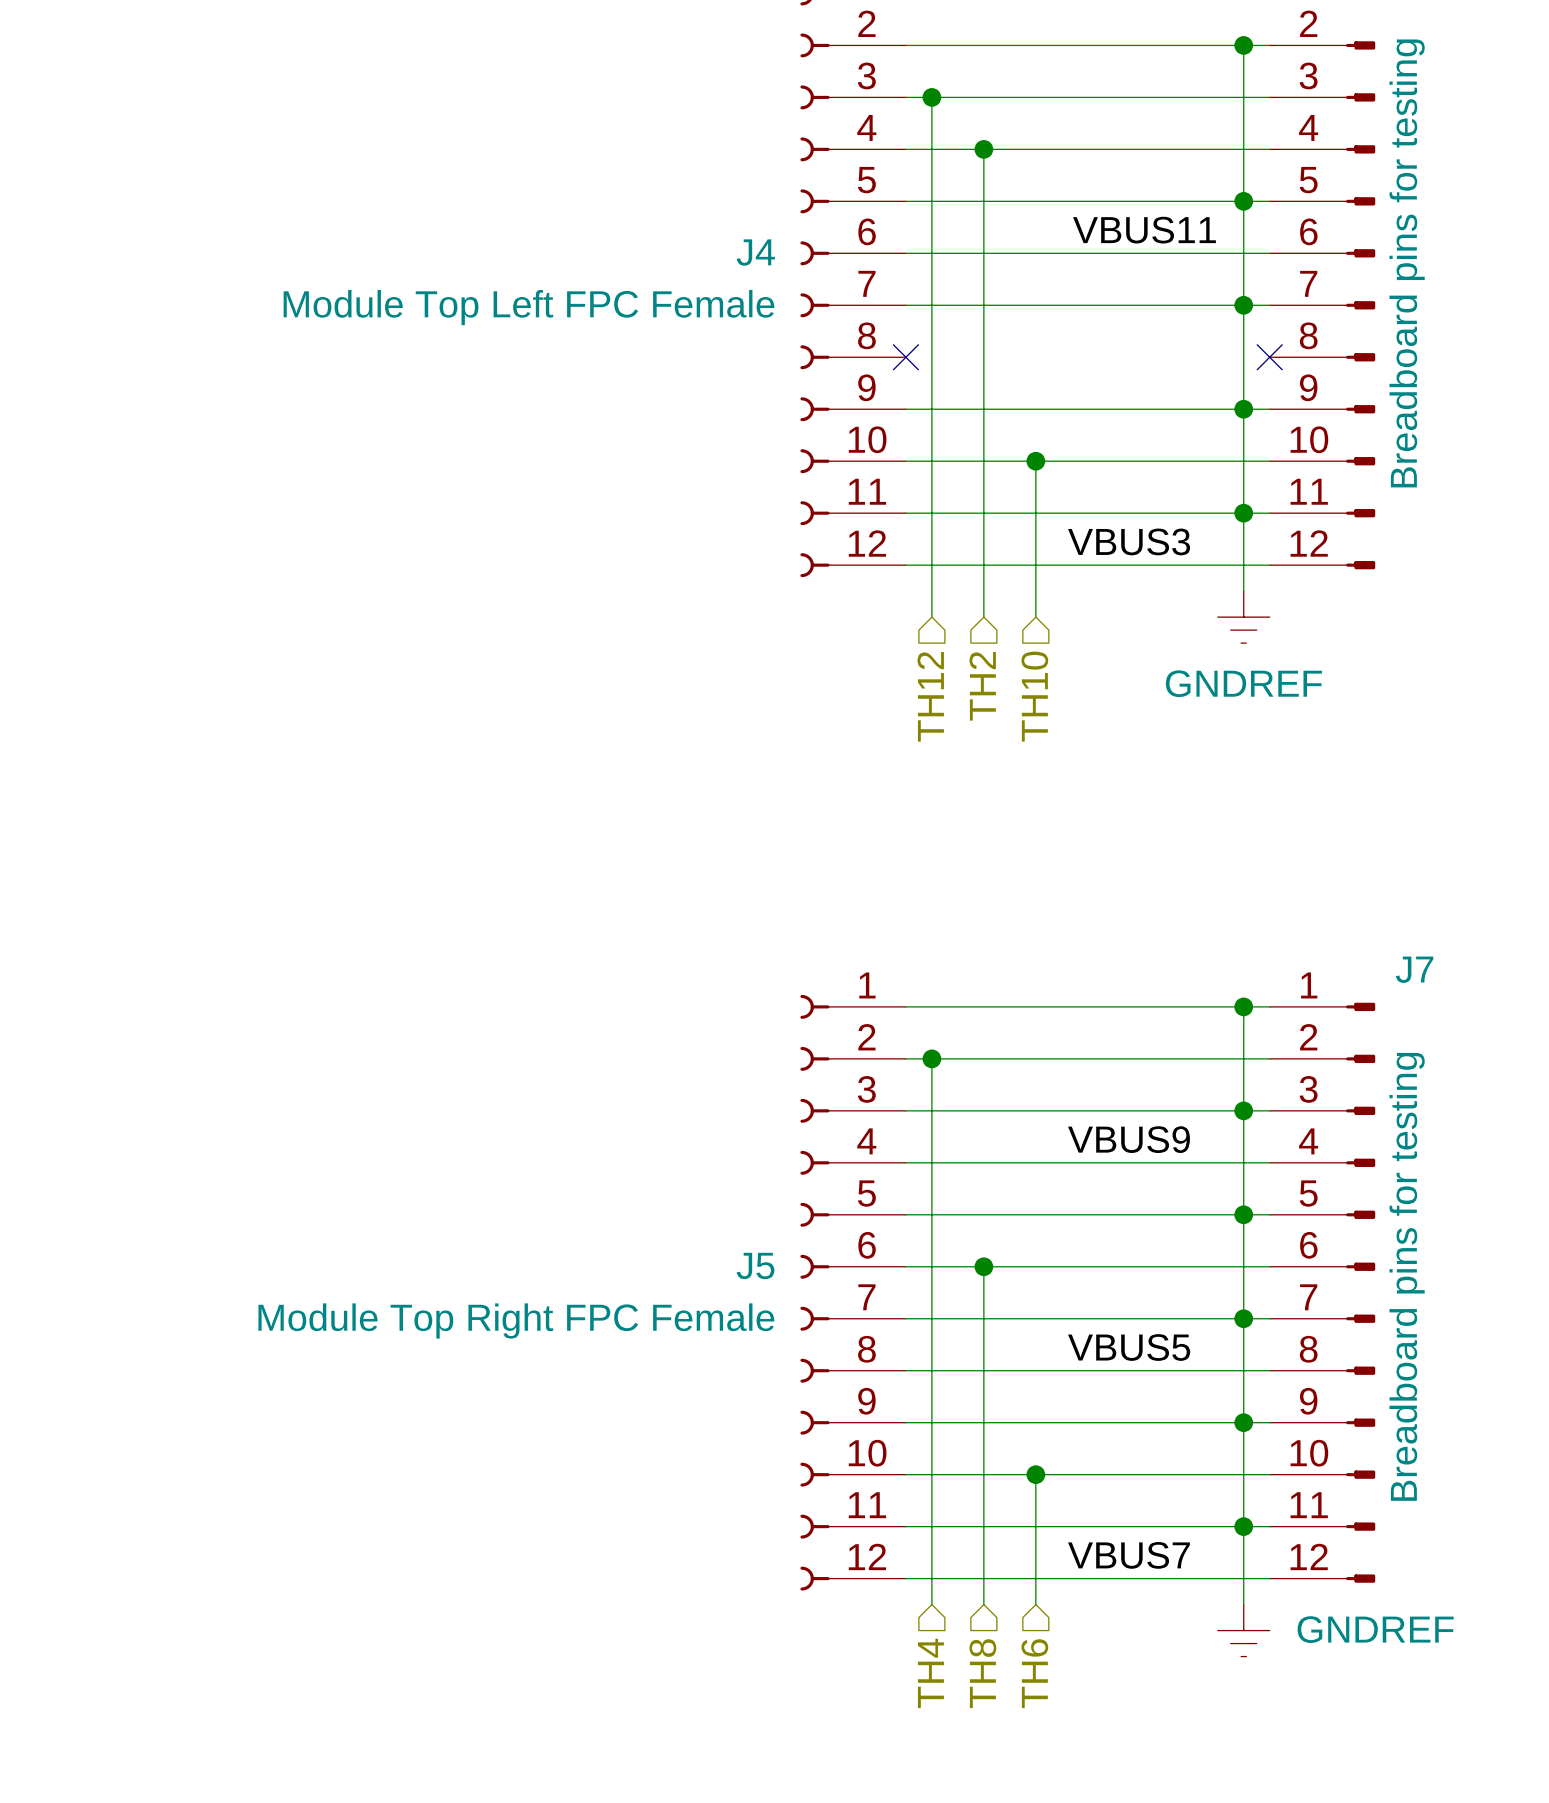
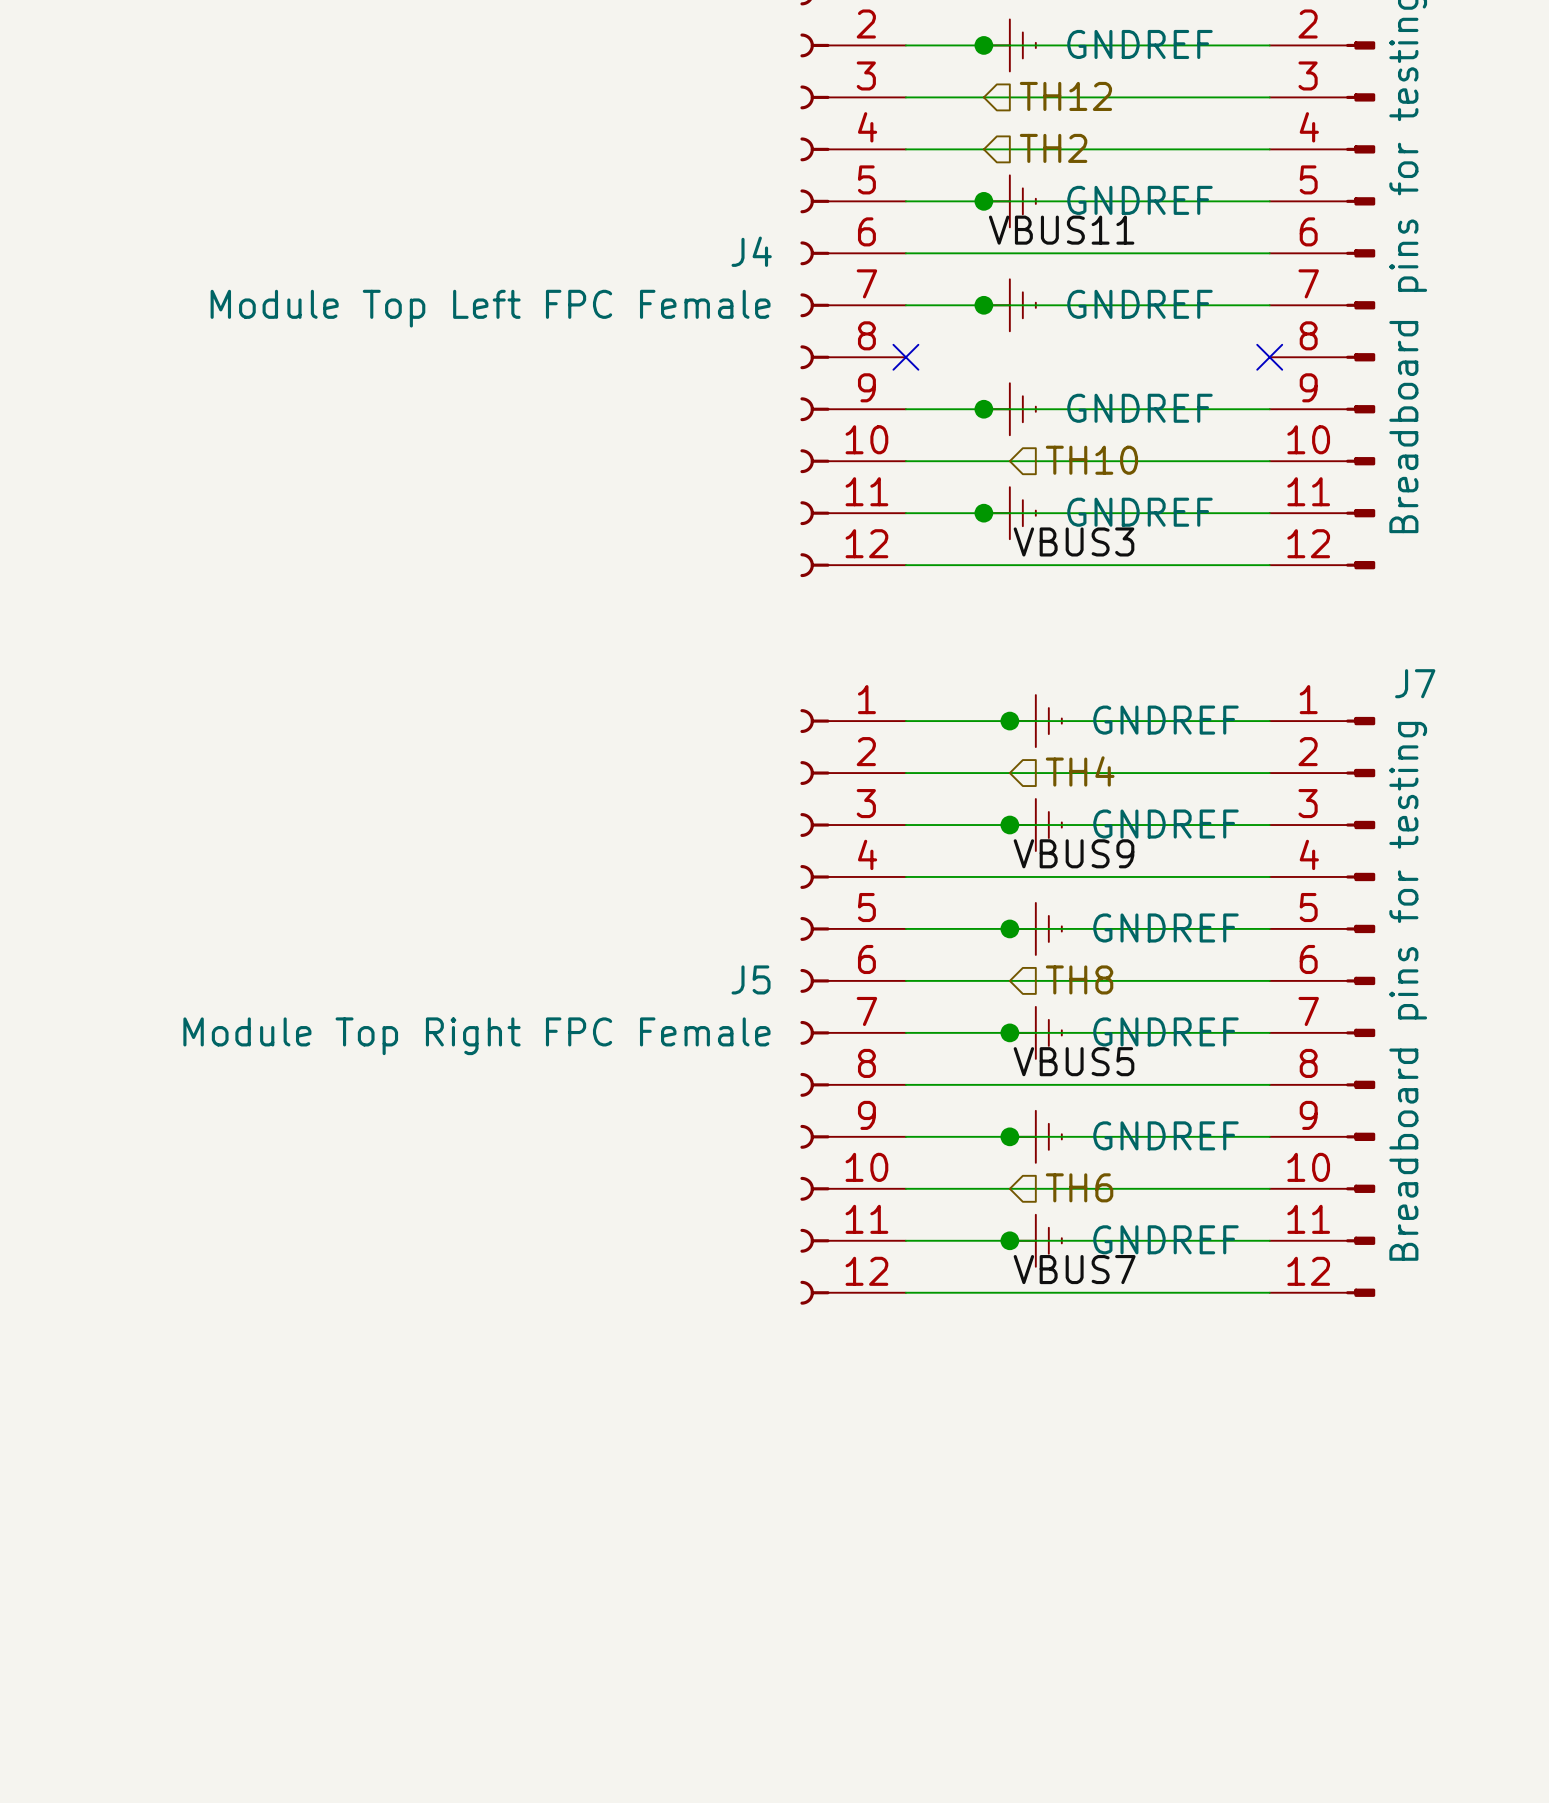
junction: none -> (983, 45)
power symbol: none -> GNDREF (1009, 45)
wire: (1243, 45) (1243, 591) -> none
junction: (1243, 45) -> none
hierarchical label: none -> TH12 (1065, 96)
wire: (931, 97) (931, 617) -> none
junction: (931, 97) -> none
wire: (983, 149) (983, 617) -> none
junction: (983, 149) -> none
junction: none -> (983, 201)
power symbol: none -> GNDREF (1009, 201)
junction: (1243, 201) -> none
label position: VBUS11 (1144, 230) -> VBUS11 (1061, 230)
junction: none -> (983, 305)
power symbol: none -> GNDREF (1009, 305)
junction: (1243, 305) -> none
junction: none -> (983, 409)
power symbol: none -> GNDREF (1009, 409)
junction: (1243, 409) -> none
wire: (1035, 461) (1035, 617) -> none
junction: (1035, 461) -> none
junction: none -> (983, 513)
power symbol: none -> GNDREF (1009, 513)
junction: (1243, 513) -> none
label position: VBUS3 (1129, 541) -> VBUS3 (1074, 541)
power symbol: GNDREF (1243, 617) -> none
hierarchical label rotation: 0° (982, 686) -> 90° counterclockwise (1053, 148)
hierarchical label position: TH2 (982, 686) -> TH2 (1053, 148)
hierarchical label: TH12 (930, 696) -> none
hierarchical label rotation: 0° (1034, 696) -> 90° counterclockwise (1091, 460)
hierarchical label position: TH10 (1034, 696) -> TH10 (1091, 460)
junction: none -> (1009, 721)
power symbol: none -> GNDREF (1035, 721)
hierarchical label: none -> TH4 (1080, 771)
junction: none -> (1009, 825)
power symbol: none -> GNDREF (1035, 825)
junction: none -> (1009, 928)
power symbol: none -> GNDREF (1035, 928)
hierarchical label: none -> TH8 (1079, 979)
wire: (905, 1006) (1269, 1006) -> (905, 721) (1269, 721)
wire: (1243, 1006) (1243, 1604) -> none
junction: (1243, 1006) -> none
junction: none -> (1009, 1032)
power symbol: none -> GNDREF (1035, 1032)
wire: (905, 1058) (1269, 1058) -> (905, 773) (1269, 773)
wire: (931, 1058) (931, 1604) -> none
junction: (931, 1058) -> none
wire: (905, 1110) (1269, 1110) -> (905, 825) (1269, 825)
junction: (1243, 1110) -> none
junction: none -> (1009, 1136)
power symbol: none -> GNDREF (1035, 1136)
label position: VBUS9 (1129, 1139) -> VBUS9 (1074, 853)
wire: (905, 1162) (1269, 1162) -> (905, 876) (1269, 876)
wire: (905, 1214) (1269, 1214) -> (905, 928) (1269, 928)
junction: (1243, 1214) -> none
power symbol: none -> GNDREF (1035, 1240)
wire: (905, 1266) (1269, 1266) -> (905, 980) (1269, 980)
wire: (983, 1266) (983, 1604) -> none
junction position: (983, 1266) -> (1009, 1240)
J5 position: (853, 1292) -> (853, 1006)
J7 position: (1322, 1292) -> (1322, 1006)
wire: (905, 1318) (1269, 1318) -> (905, 1032) (1269, 1032)
junction: (1243, 1318) -> none
label position: VBUS5 (1129, 1347) -> VBUS5 (1074, 1061)
wire: (905, 1370) (1269, 1370) -> (905, 1084) (1269, 1084)
wire: (905, 1422) (1269, 1422) -> (905, 1136) (1269, 1136)
junction: (1243, 1422) -> none
wire: (905, 1474) (1269, 1474) -> (905, 1188) (1269, 1188)
wire: (1035, 1474) (1035, 1604) -> none
junction: (1035, 1474) -> none
wire: (905, 1526) (1269, 1526) -> (905, 1240) (1269, 1240)
junction: (1243, 1526) -> none
label position: VBUS7 (1128, 1555) -> VBUS7 (1074, 1269)
wire: (905, 1578) (1269, 1578) -> (905, 1292) (1269, 1292)
power symbol: GNDREF (1243, 1630) -> none
hierarchical label: TH4 (930, 1673) -> none
hierarchical label: TH8 (982, 1673) -> none
hierarchical label rotation: 0° (1034, 1673) -> 90° counterclockwise (1079, 1187)
hierarchical label position: TH6 (1034, 1673) -> TH6 (1079, 1187)

